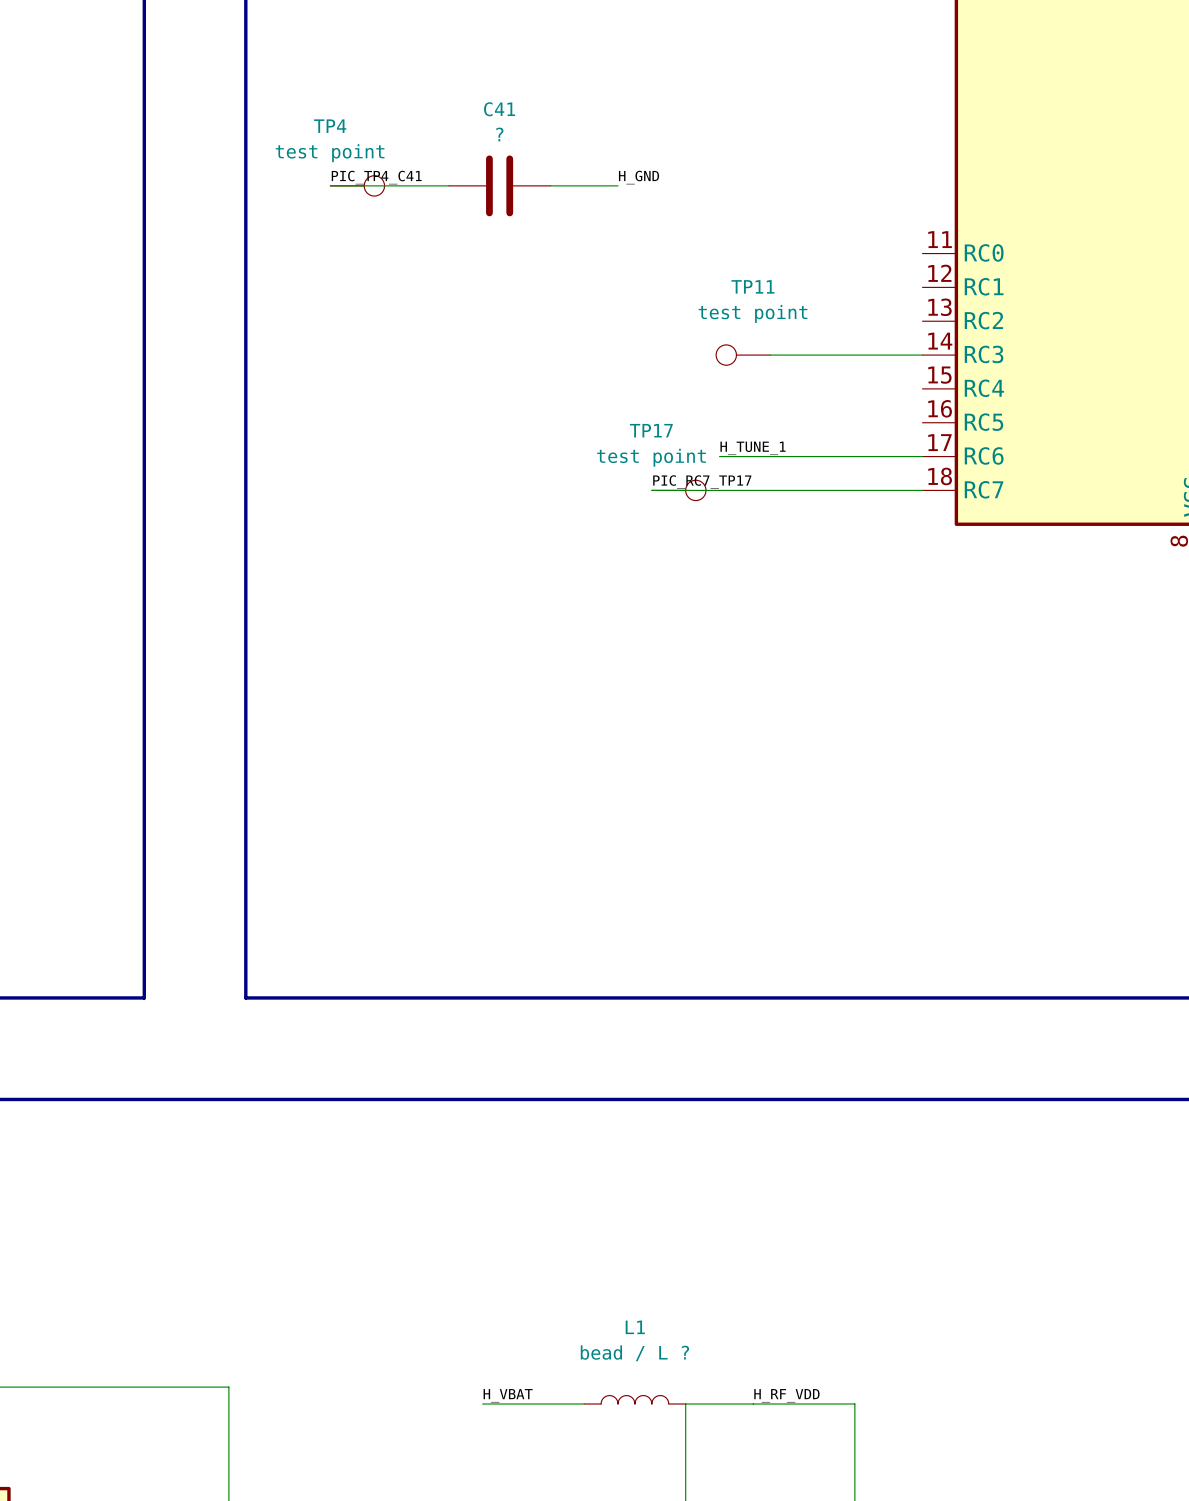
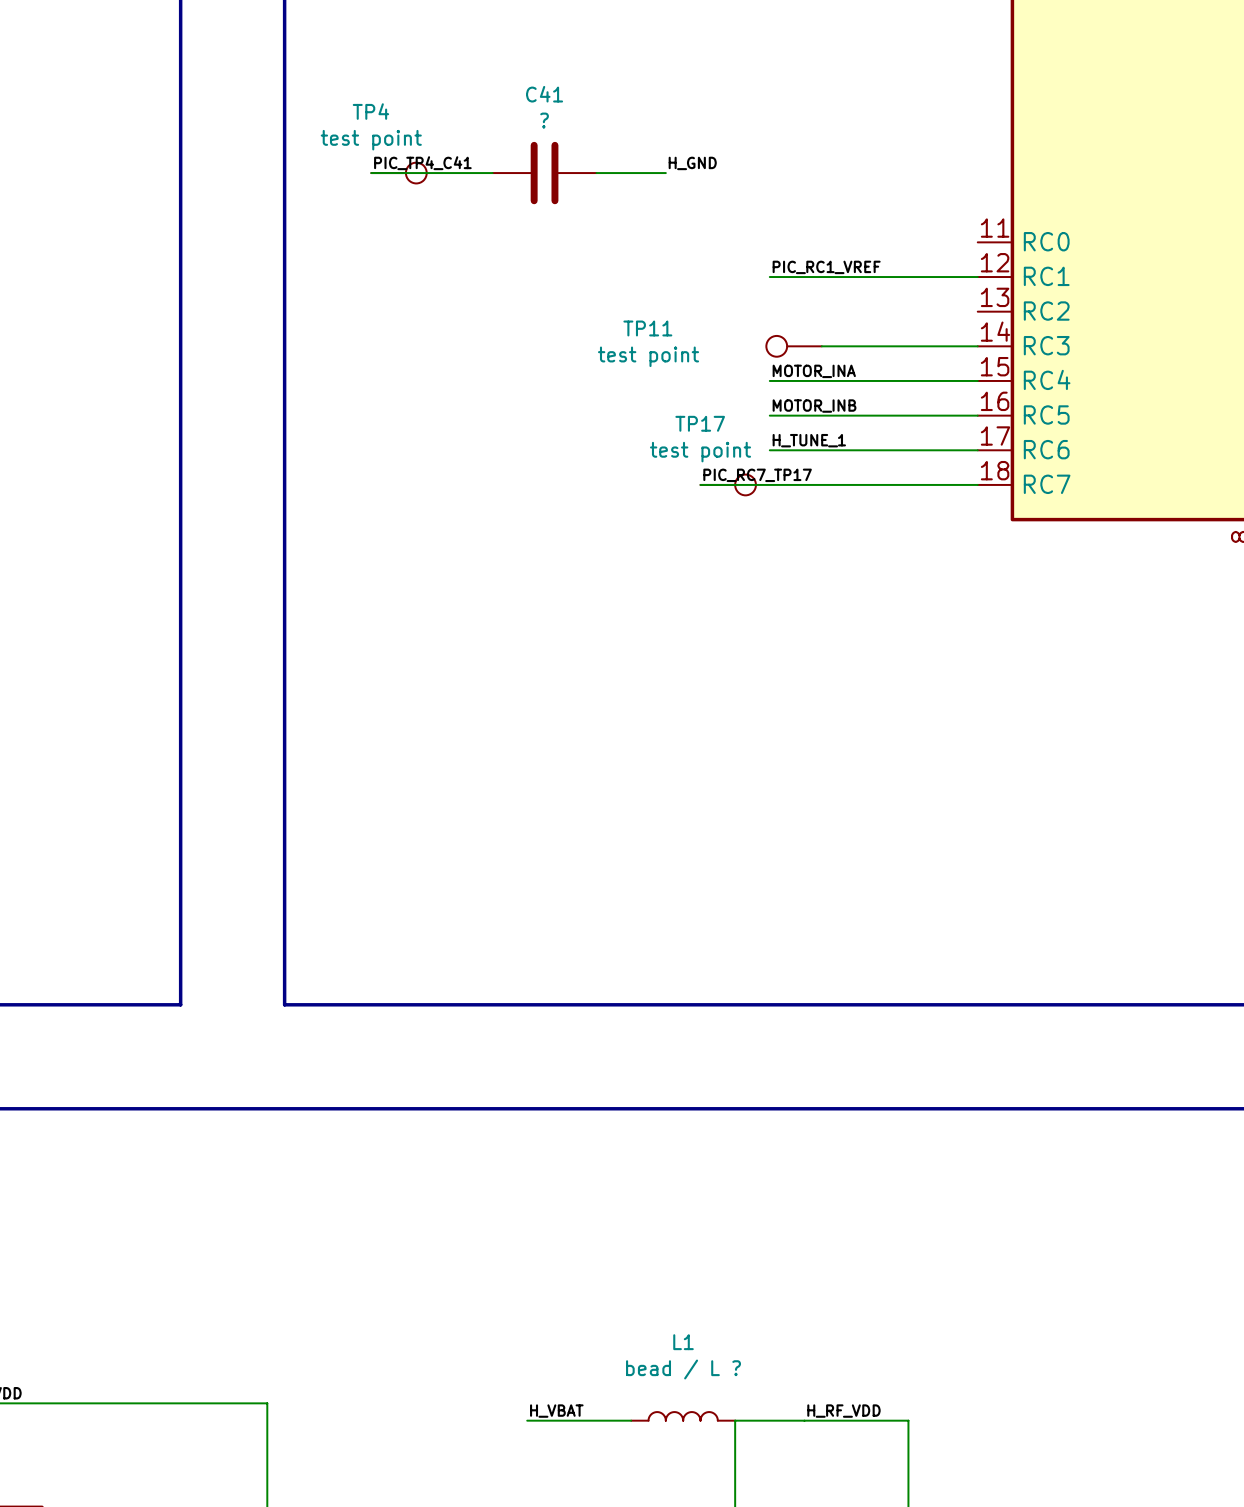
label: none -> PIC_RC1_VREF (826, 267)
TP11 name position: TP11 (752, 286) -> TP11 (647, 328)
wire: none -> (769, 277) (977, 277)
TP11 value position: test point (753, 313) -> test point (648, 356)
label: none -> MOTOR_INA (814, 371)
wire: none -> (769, 380) (977, 380)
label: none -> MOTOR_INB (814, 406)
wire: none -> (769, 415) (977, 415)

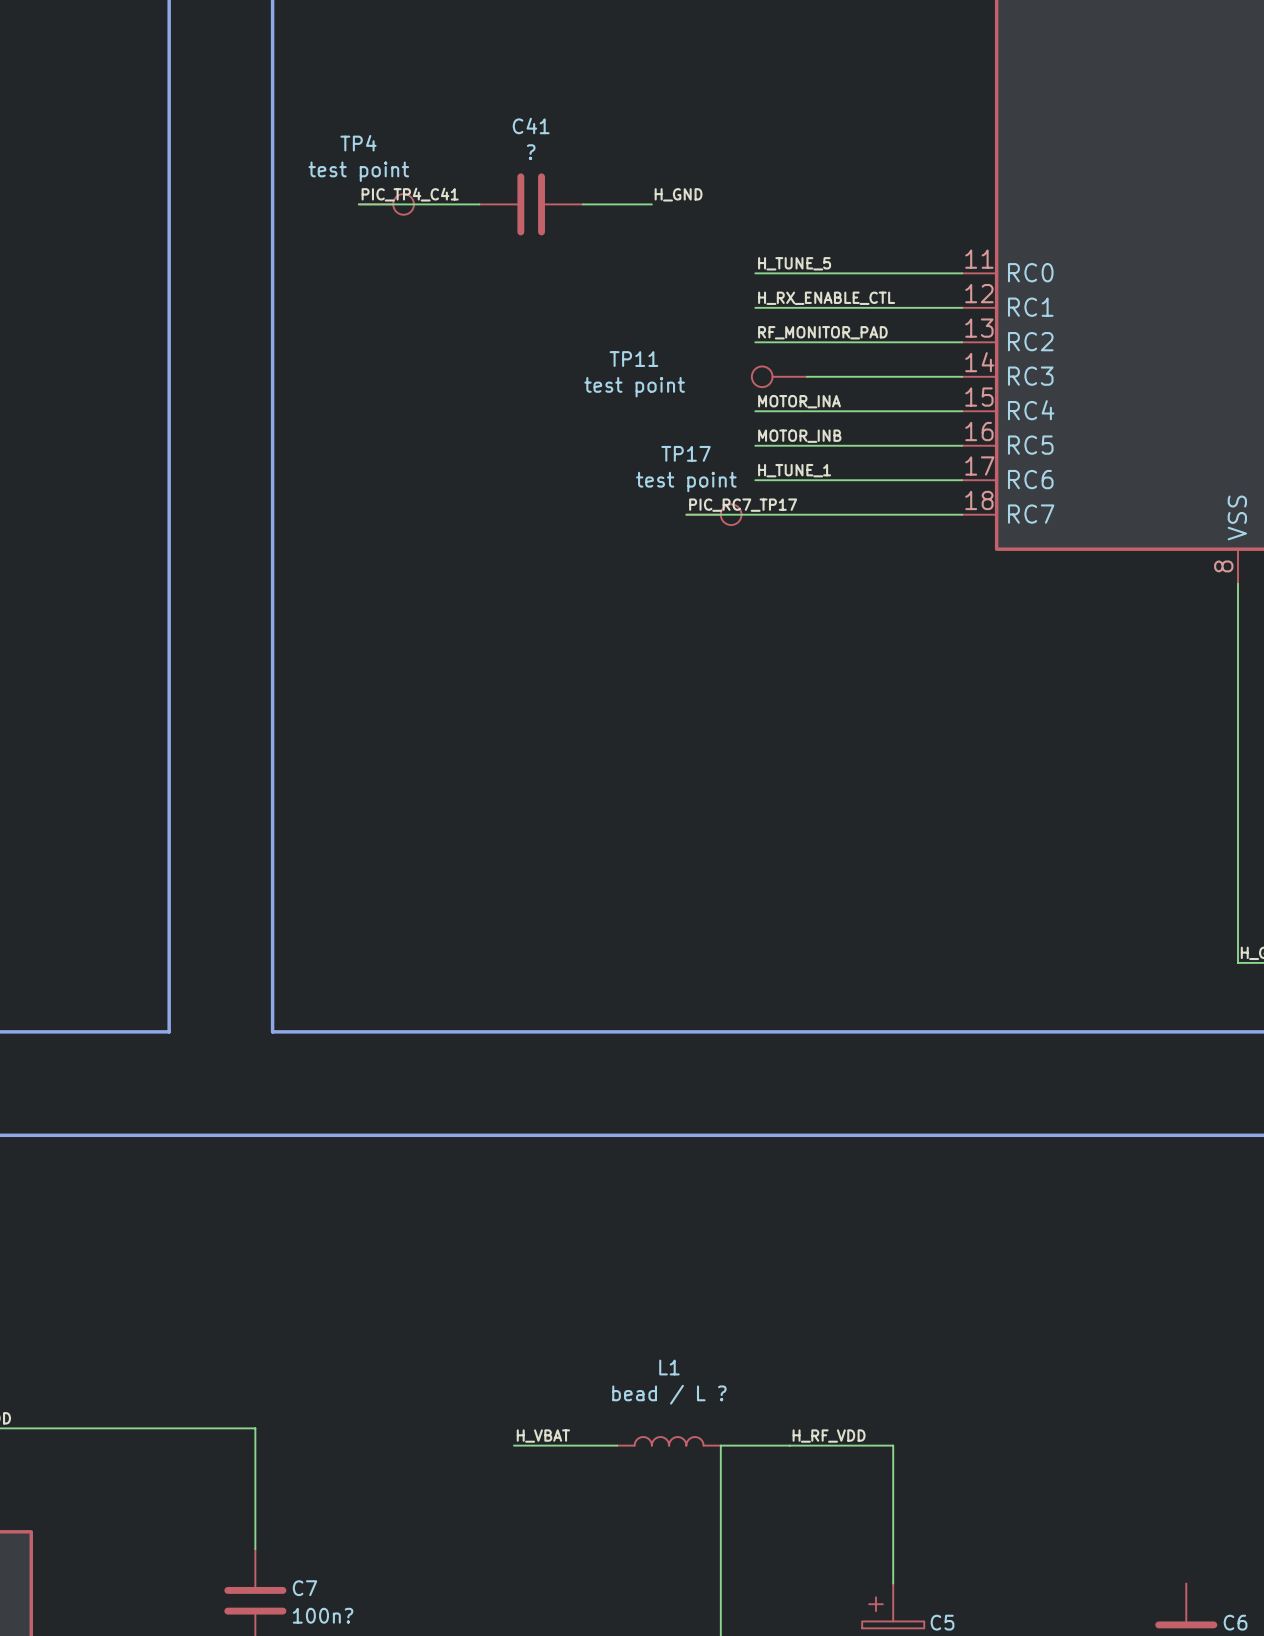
label: none -> H_TUNE_5 (794, 263)
wire: none -> (755, 273) (962, 273)
label: PIC_RC1_VREF (826, 267) -> H_RX_ENABLE_CTL (826, 298)
label: none -> RF_MONITOR_PAD (822, 332)
wire: none -> (755, 342) (962, 342)

